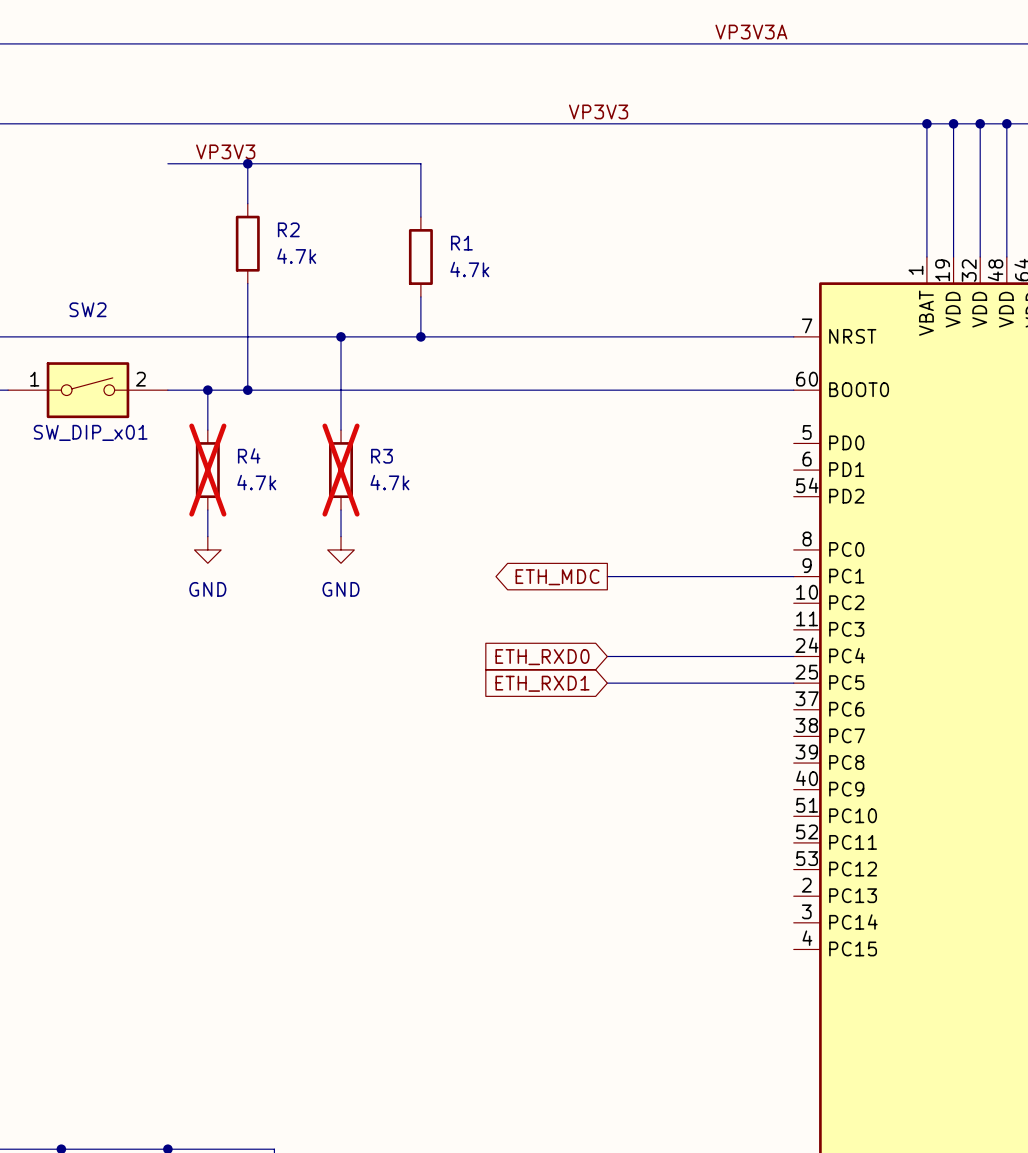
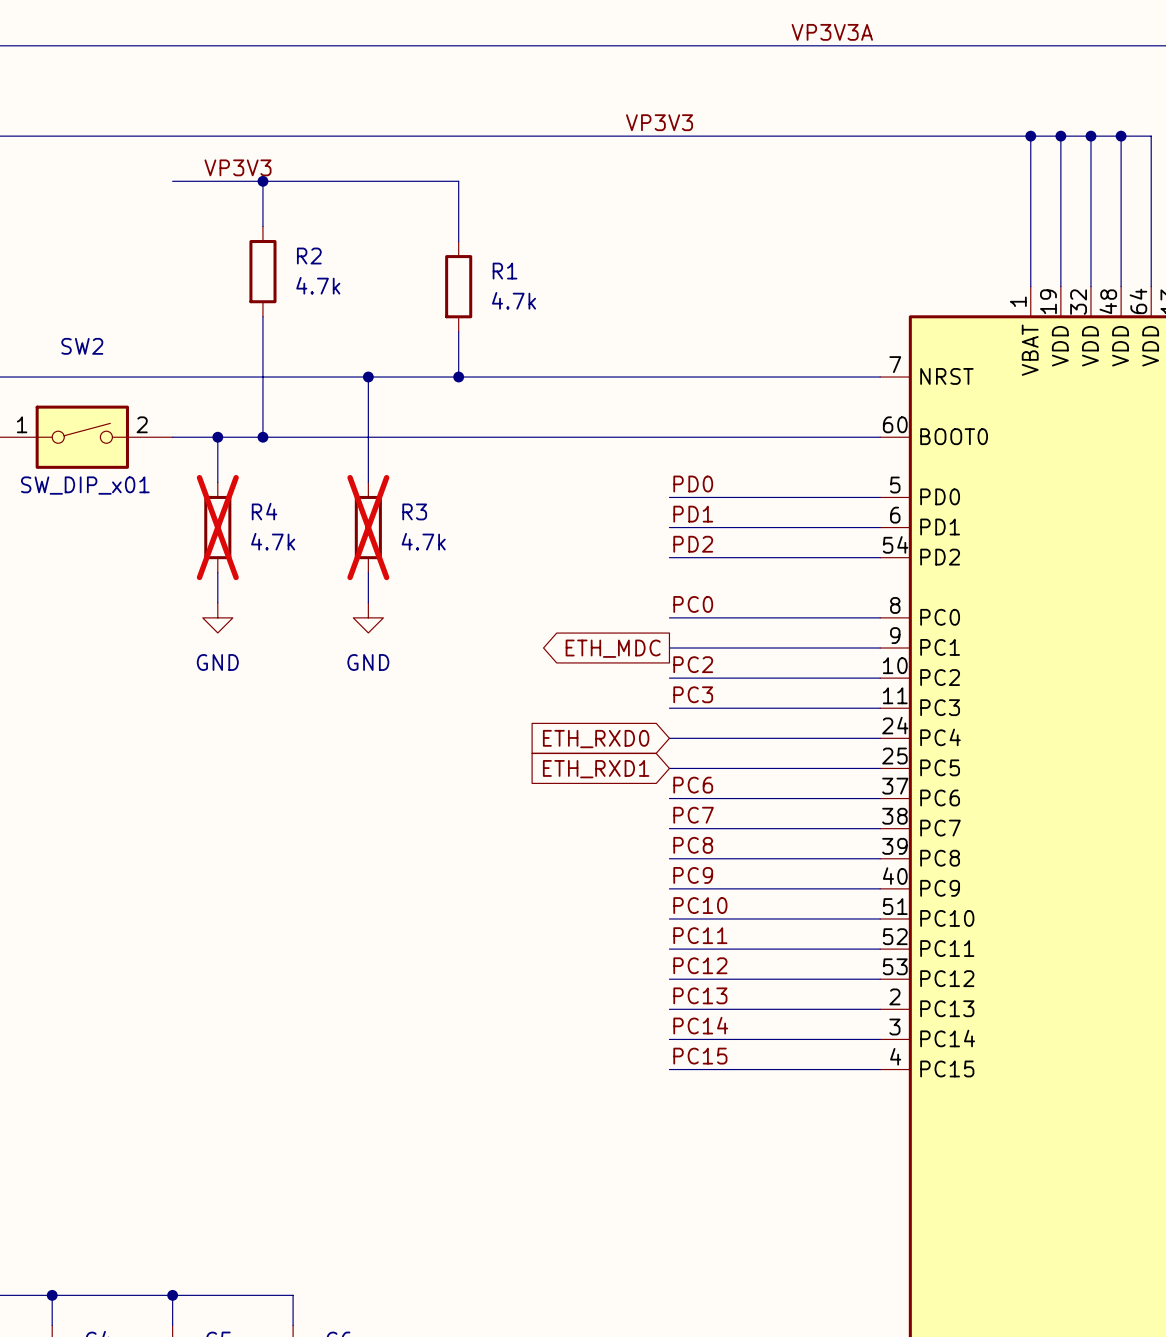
label: none -> PD0 (693, 484)
wire: none -> (669, 497) (880, 497)
label: none -> PD1 (693, 514)
wire: none -> (669, 527) (880, 527)
label: none -> PD2 (693, 544)
wire: none -> (669, 557) (880, 557)
label: none -> PC0 (693, 604)
wire: none -> (669, 617) (880, 617)
label: none -> PC2 (693, 664)
wire: none -> (669, 678) (880, 678)
label: none -> PC3 (693, 694)
wire: none -> (669, 708) (880, 708)
label: none -> PC6 (693, 785)
wire: none -> (669, 798) (880, 798)
label: none -> PC7 (693, 815)
wire: none -> (669, 828) (880, 828)
label: none -> PC8 (693, 845)
wire: none -> (669, 858) (880, 858)
label: none -> PC9 (693, 875)
wire: none -> (669, 888) (880, 888)
label: none -> PC10 (700, 905)
wire: none -> (669, 918) (880, 918)
label: none -> PC11 (700, 935)
wire: none -> (669, 949) (880, 949)
label: none -> PC12 (700, 965)
wire: none -> (669, 979) (880, 979)
label: none -> PC13 (700, 995)
wire: none -> (669, 1009) (880, 1009)
label: none -> PC14 (700, 1025)
wire: none -> (669, 1039) (880, 1039)
label: none -> PC15 (700, 1056)
wire: none -> (669, 1069) (880, 1069)

